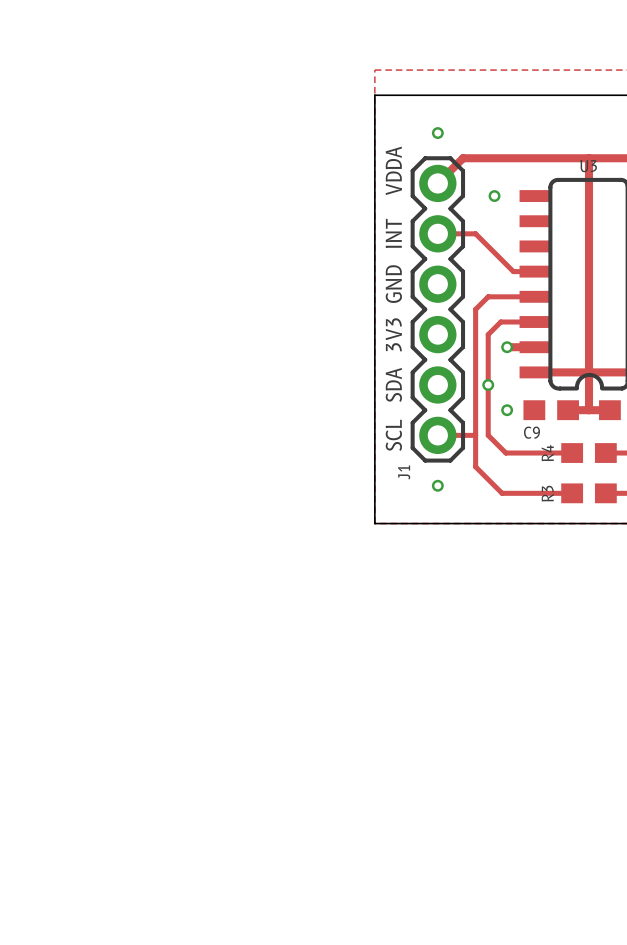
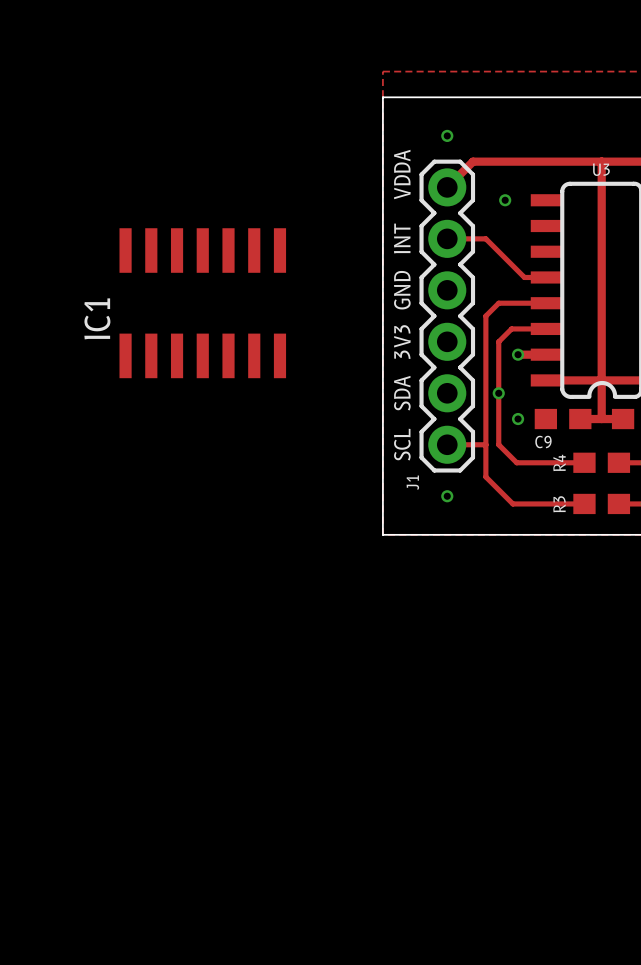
IC1: none -> (202, 303)

